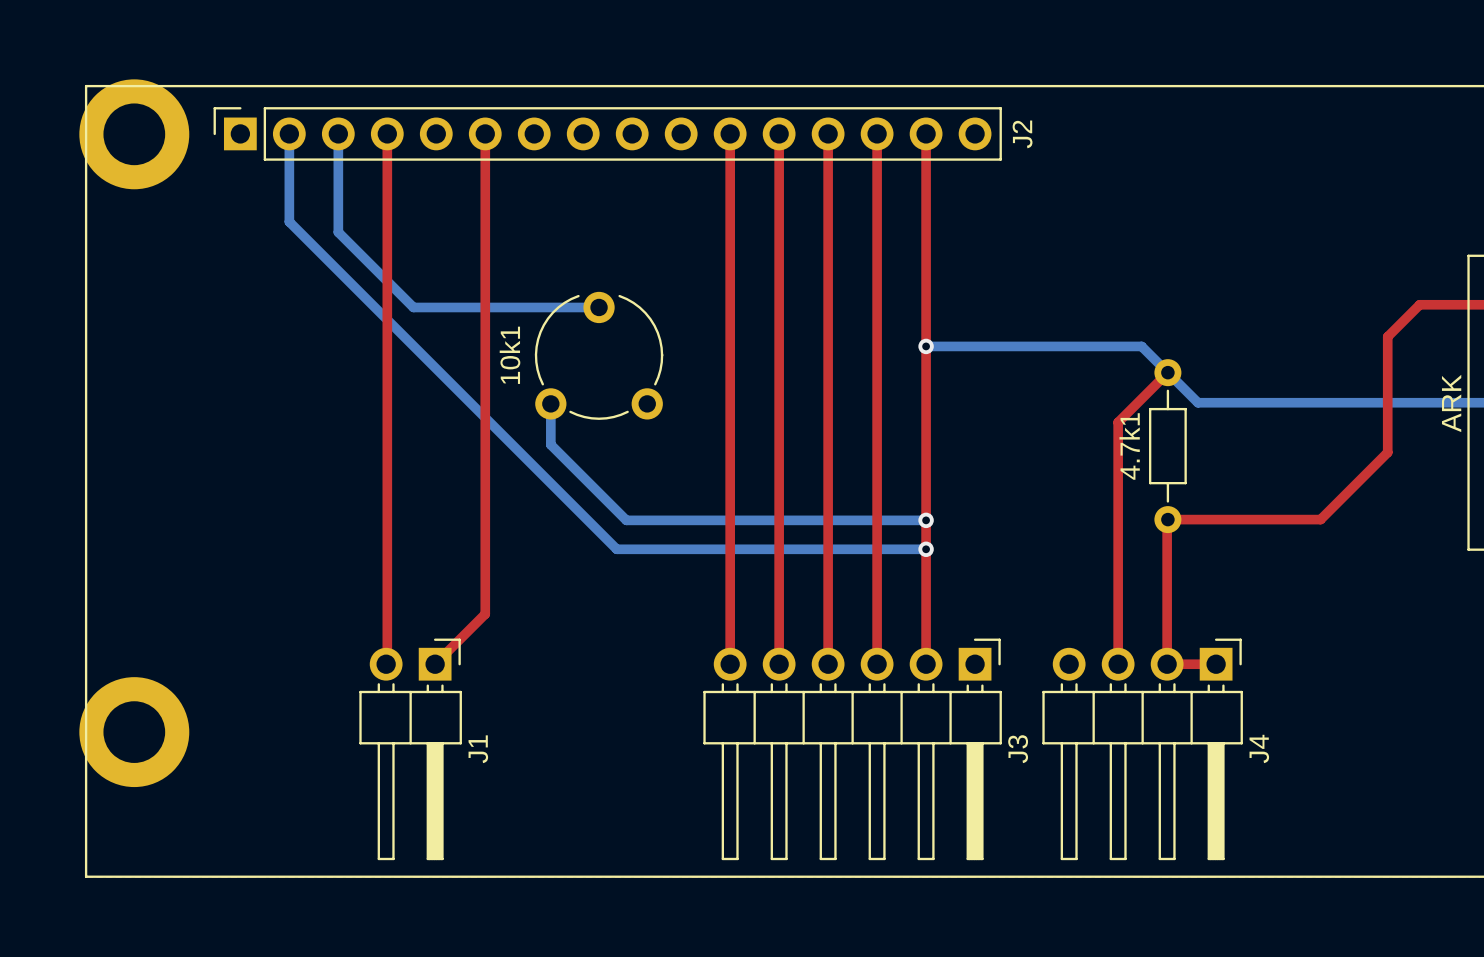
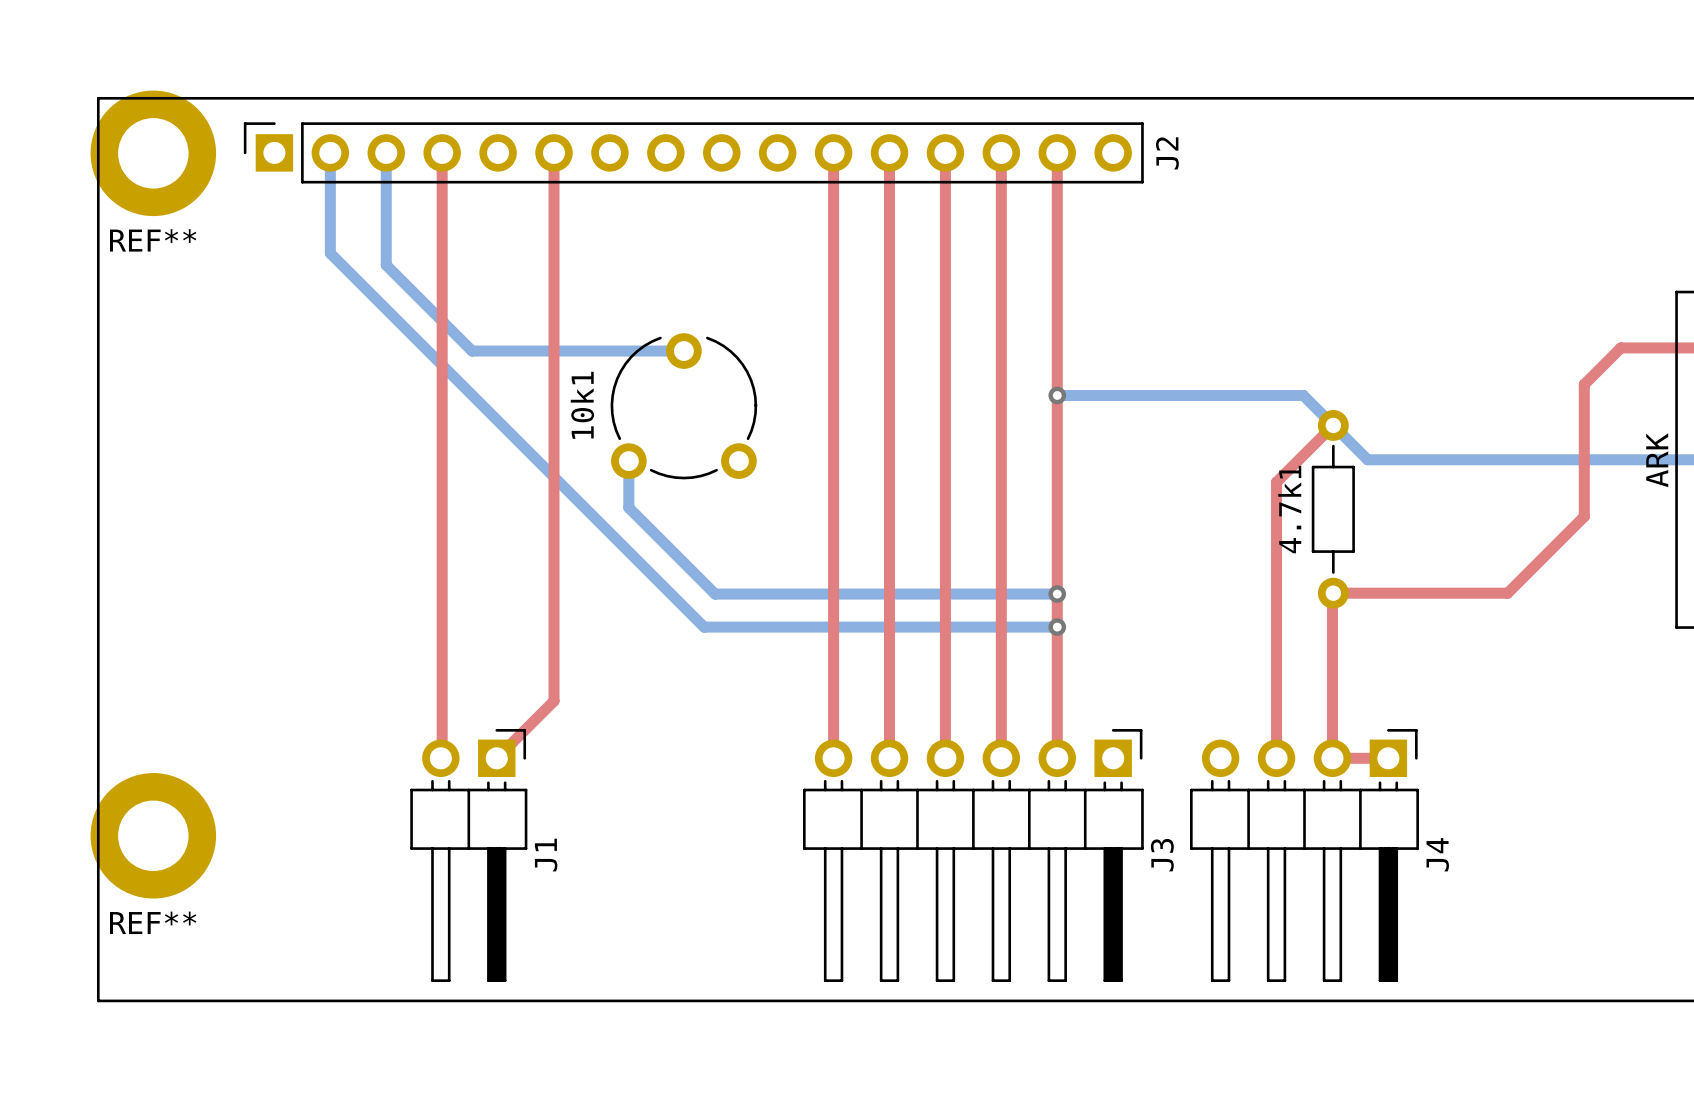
REF** name: none -> REF** (153, 240)
REF** name: none -> REF** (153, 922)

